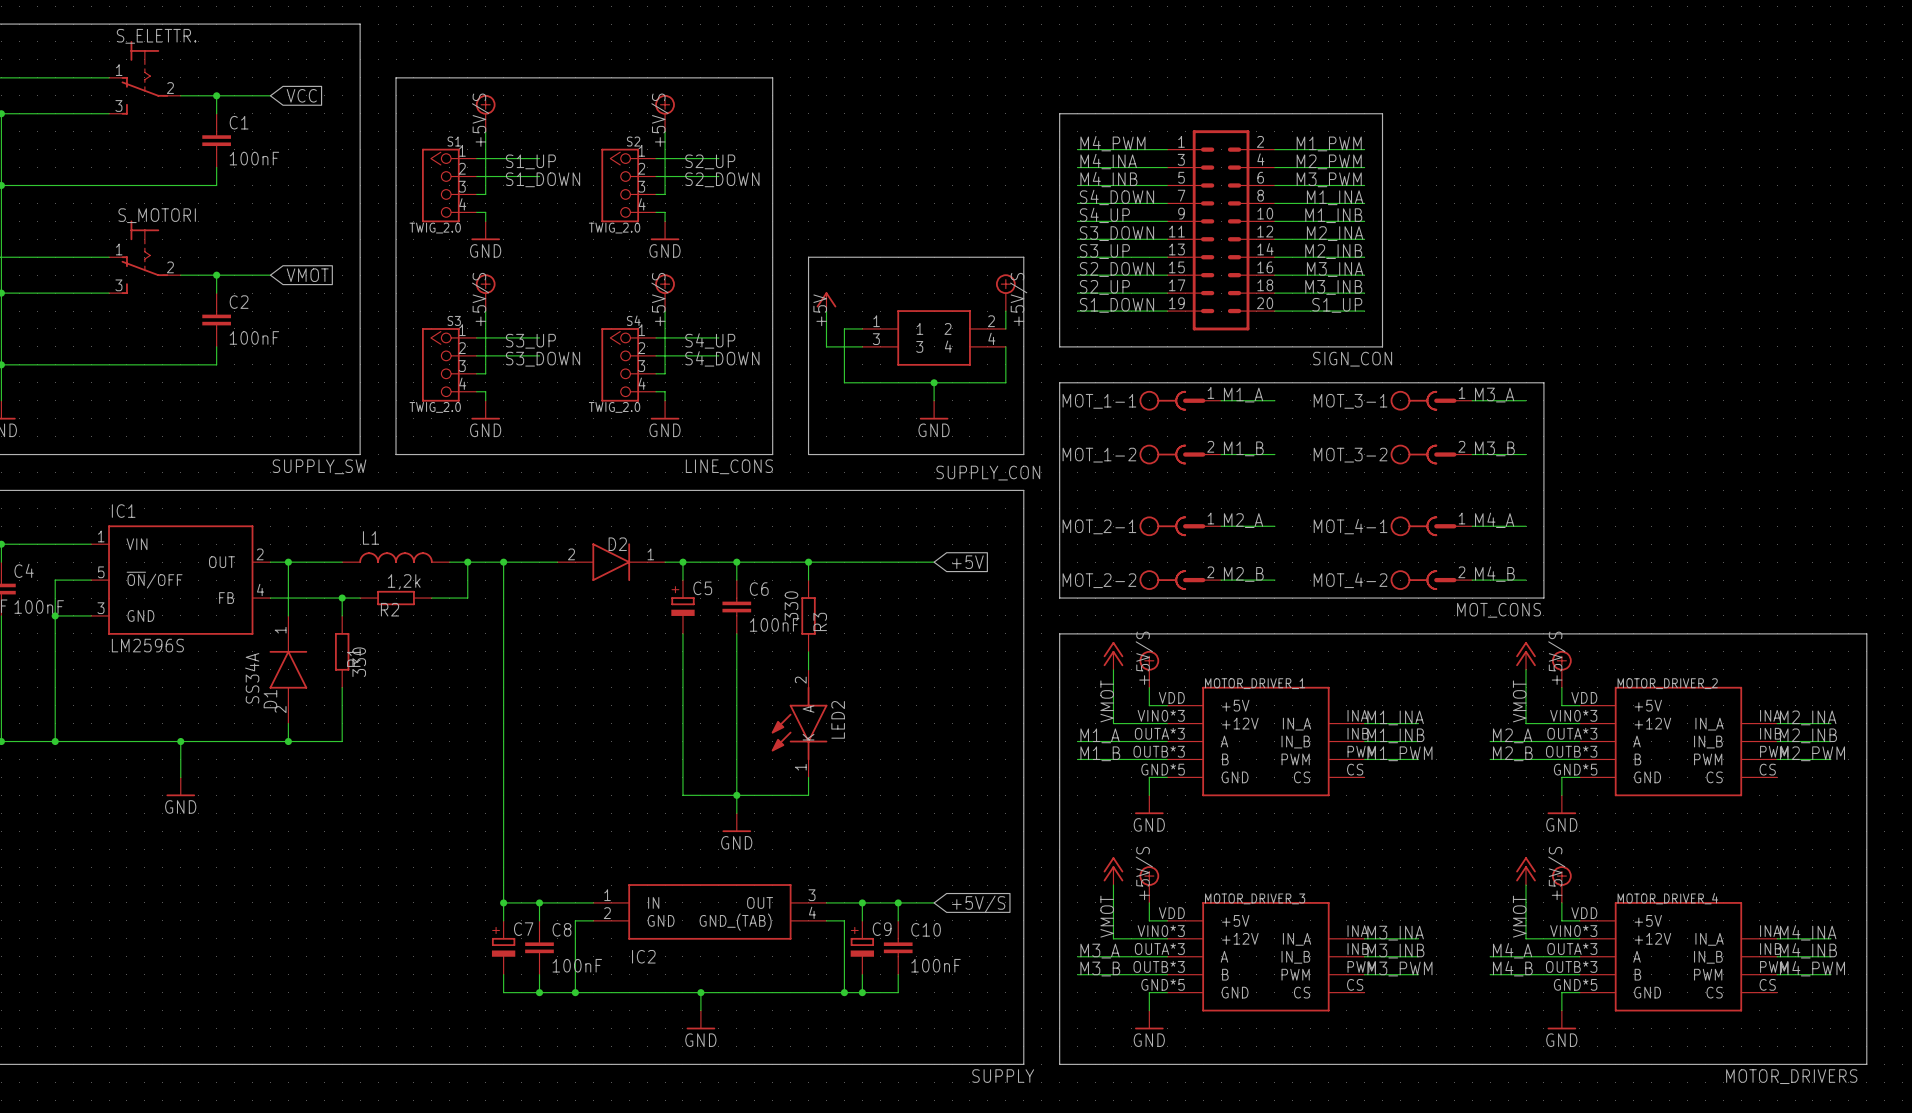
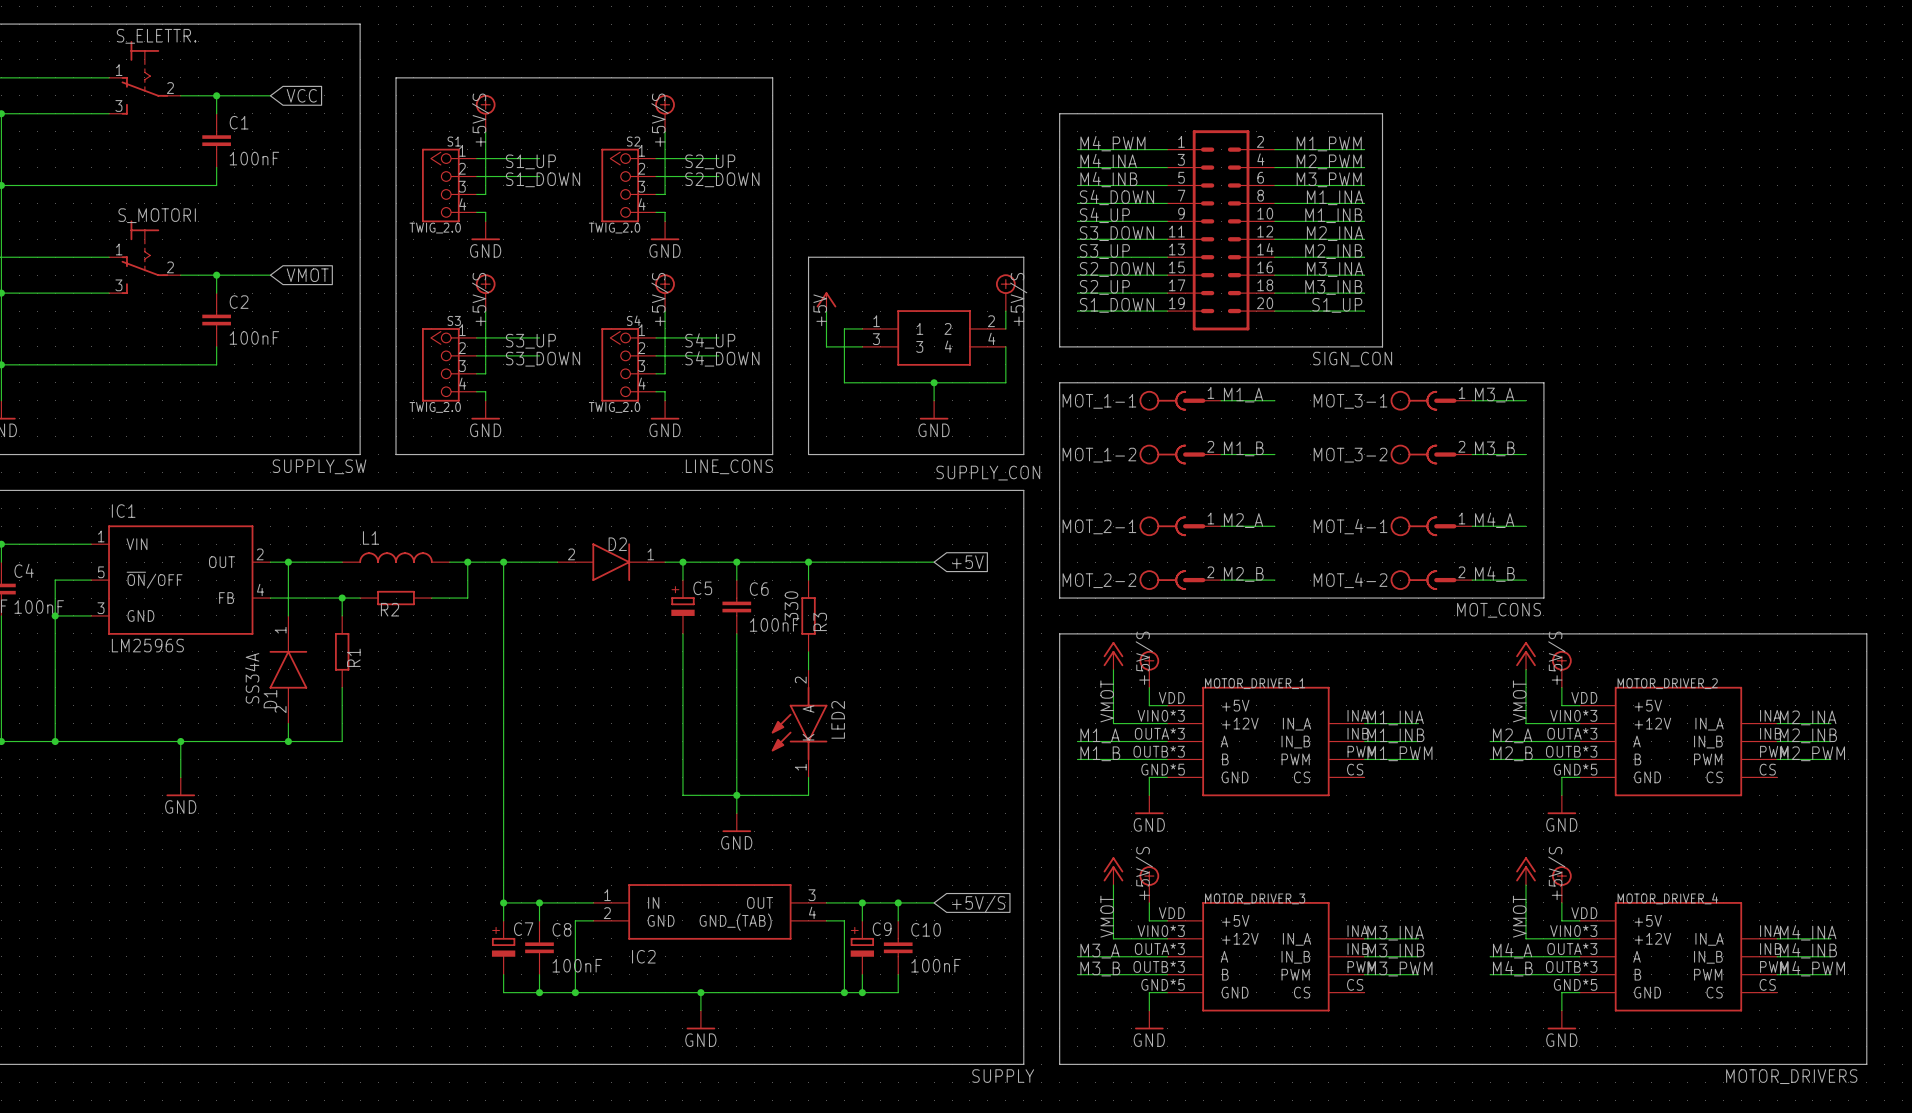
R2 value: 1,2k (404, 581) -> none
R1 value: 330 (359, 662) -> none

